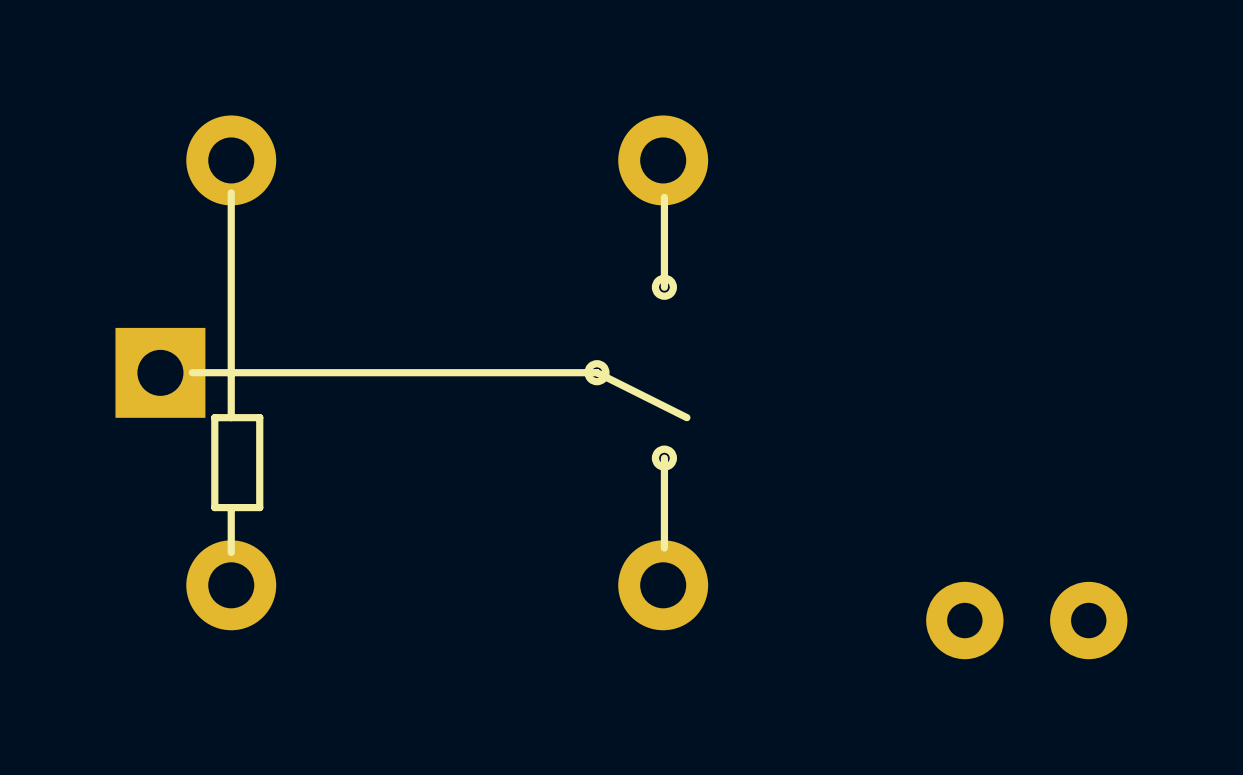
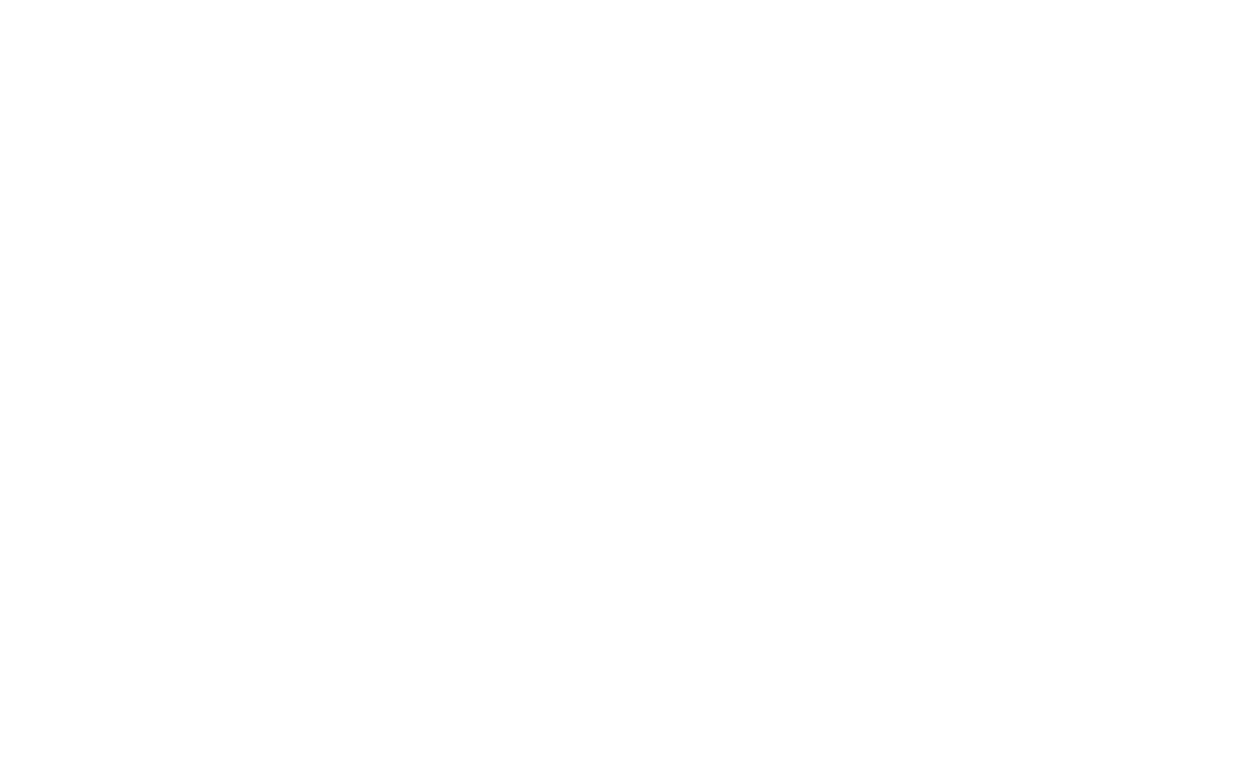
part: (411, 372) -> none
part: (1026, 620) -> none

